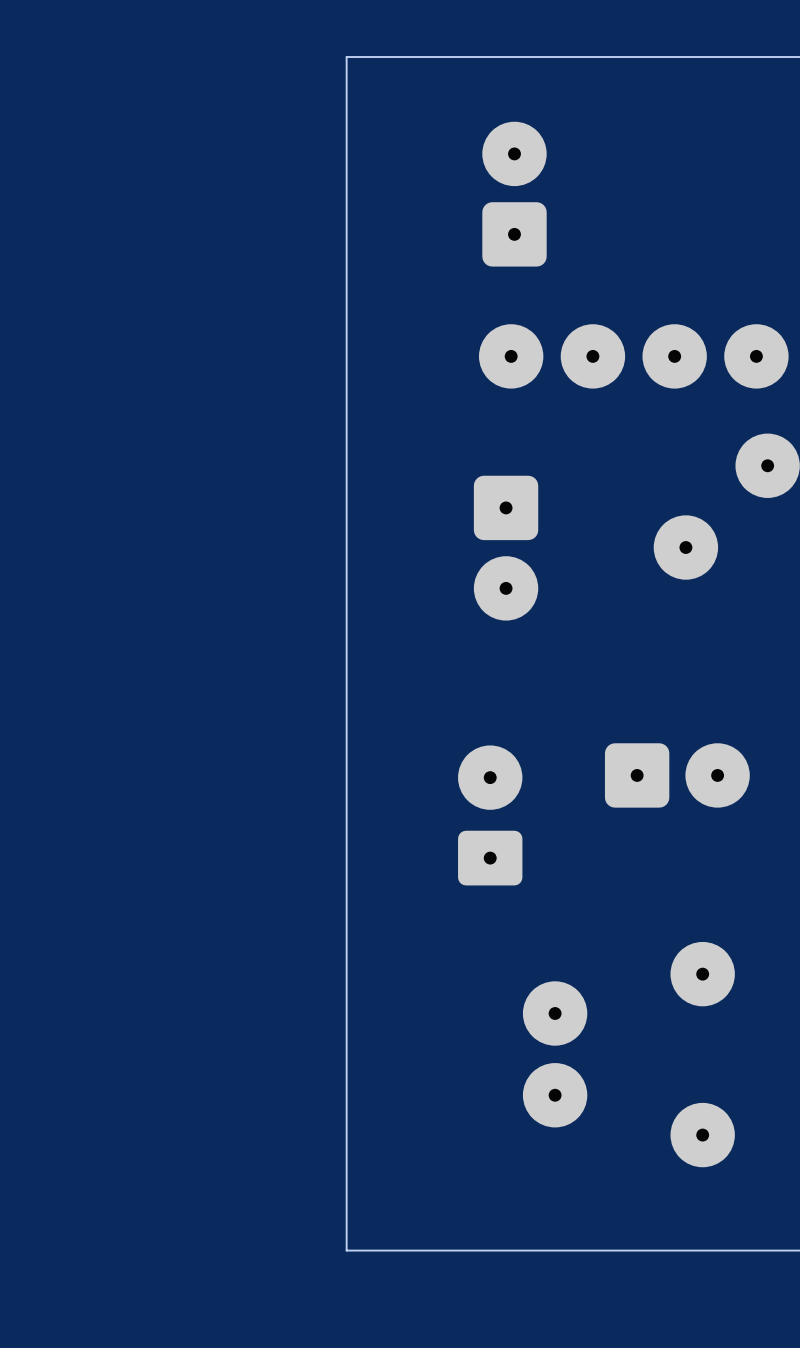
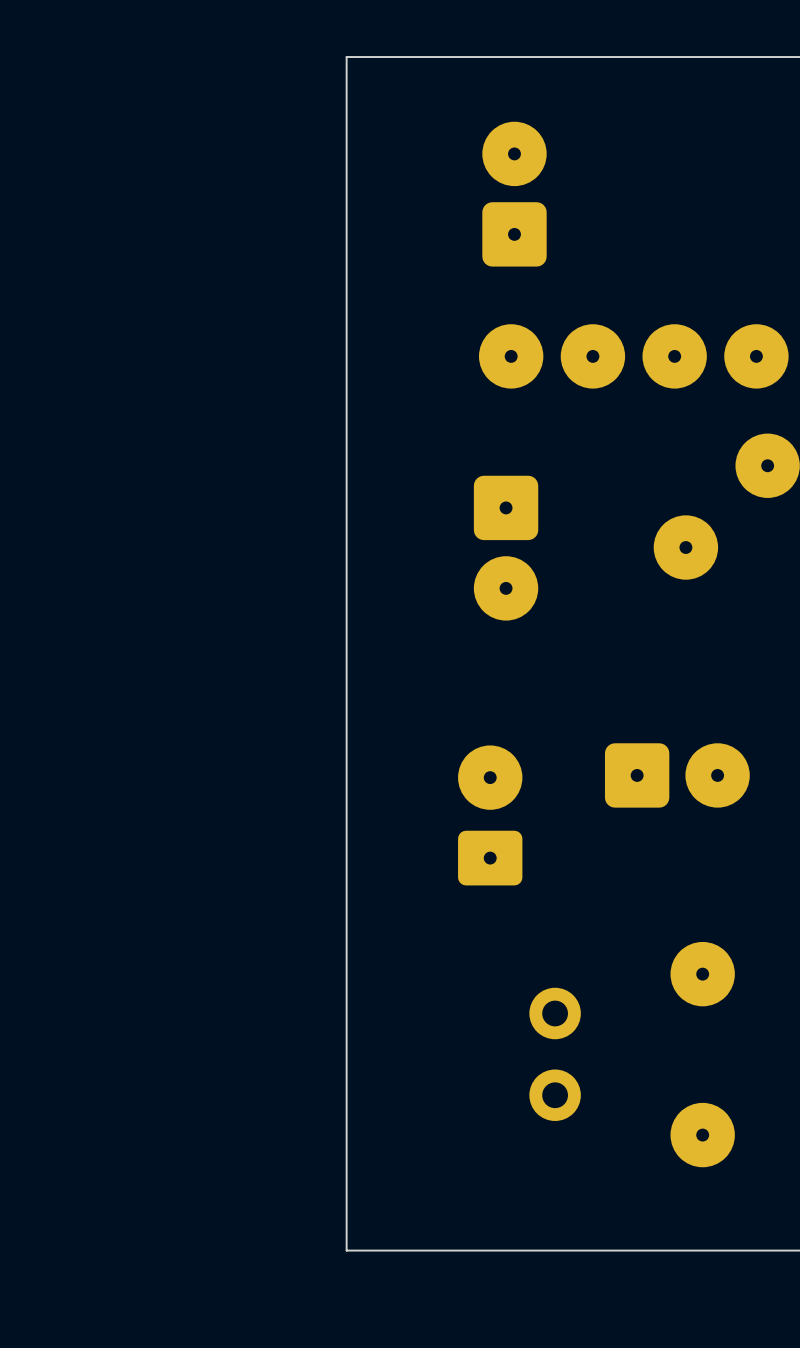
part footprint: [522, 981, 588, 1128] -> [529, 987, 581, 1122]

